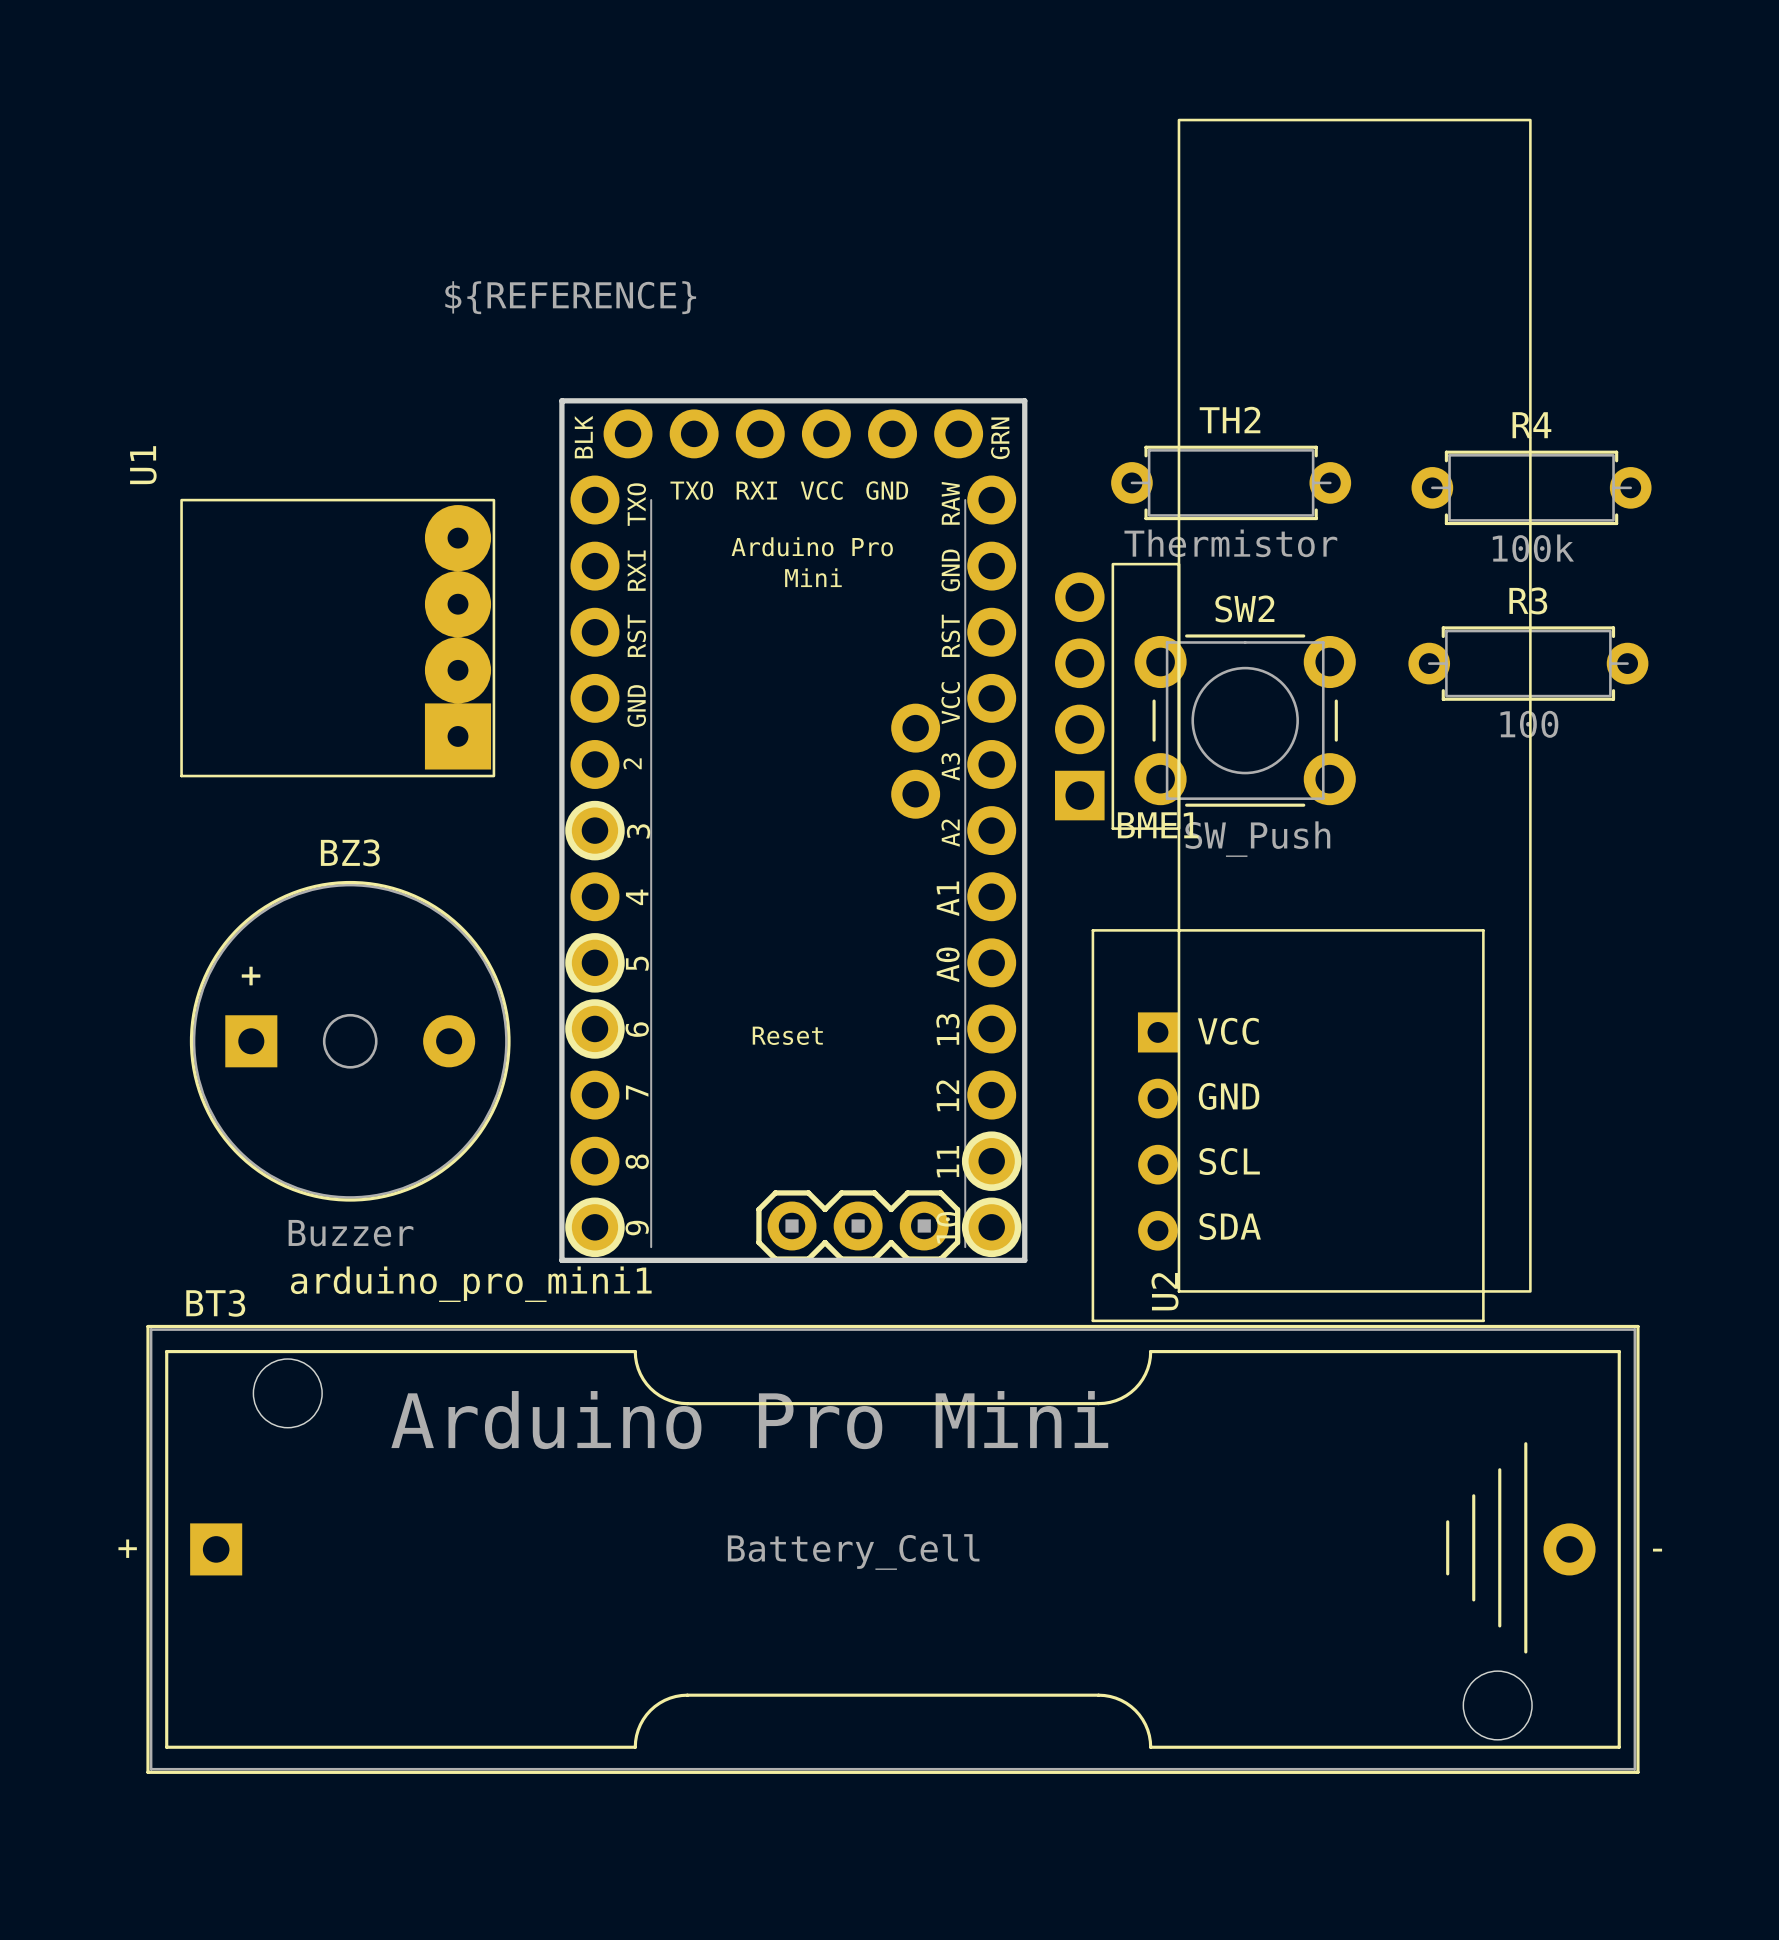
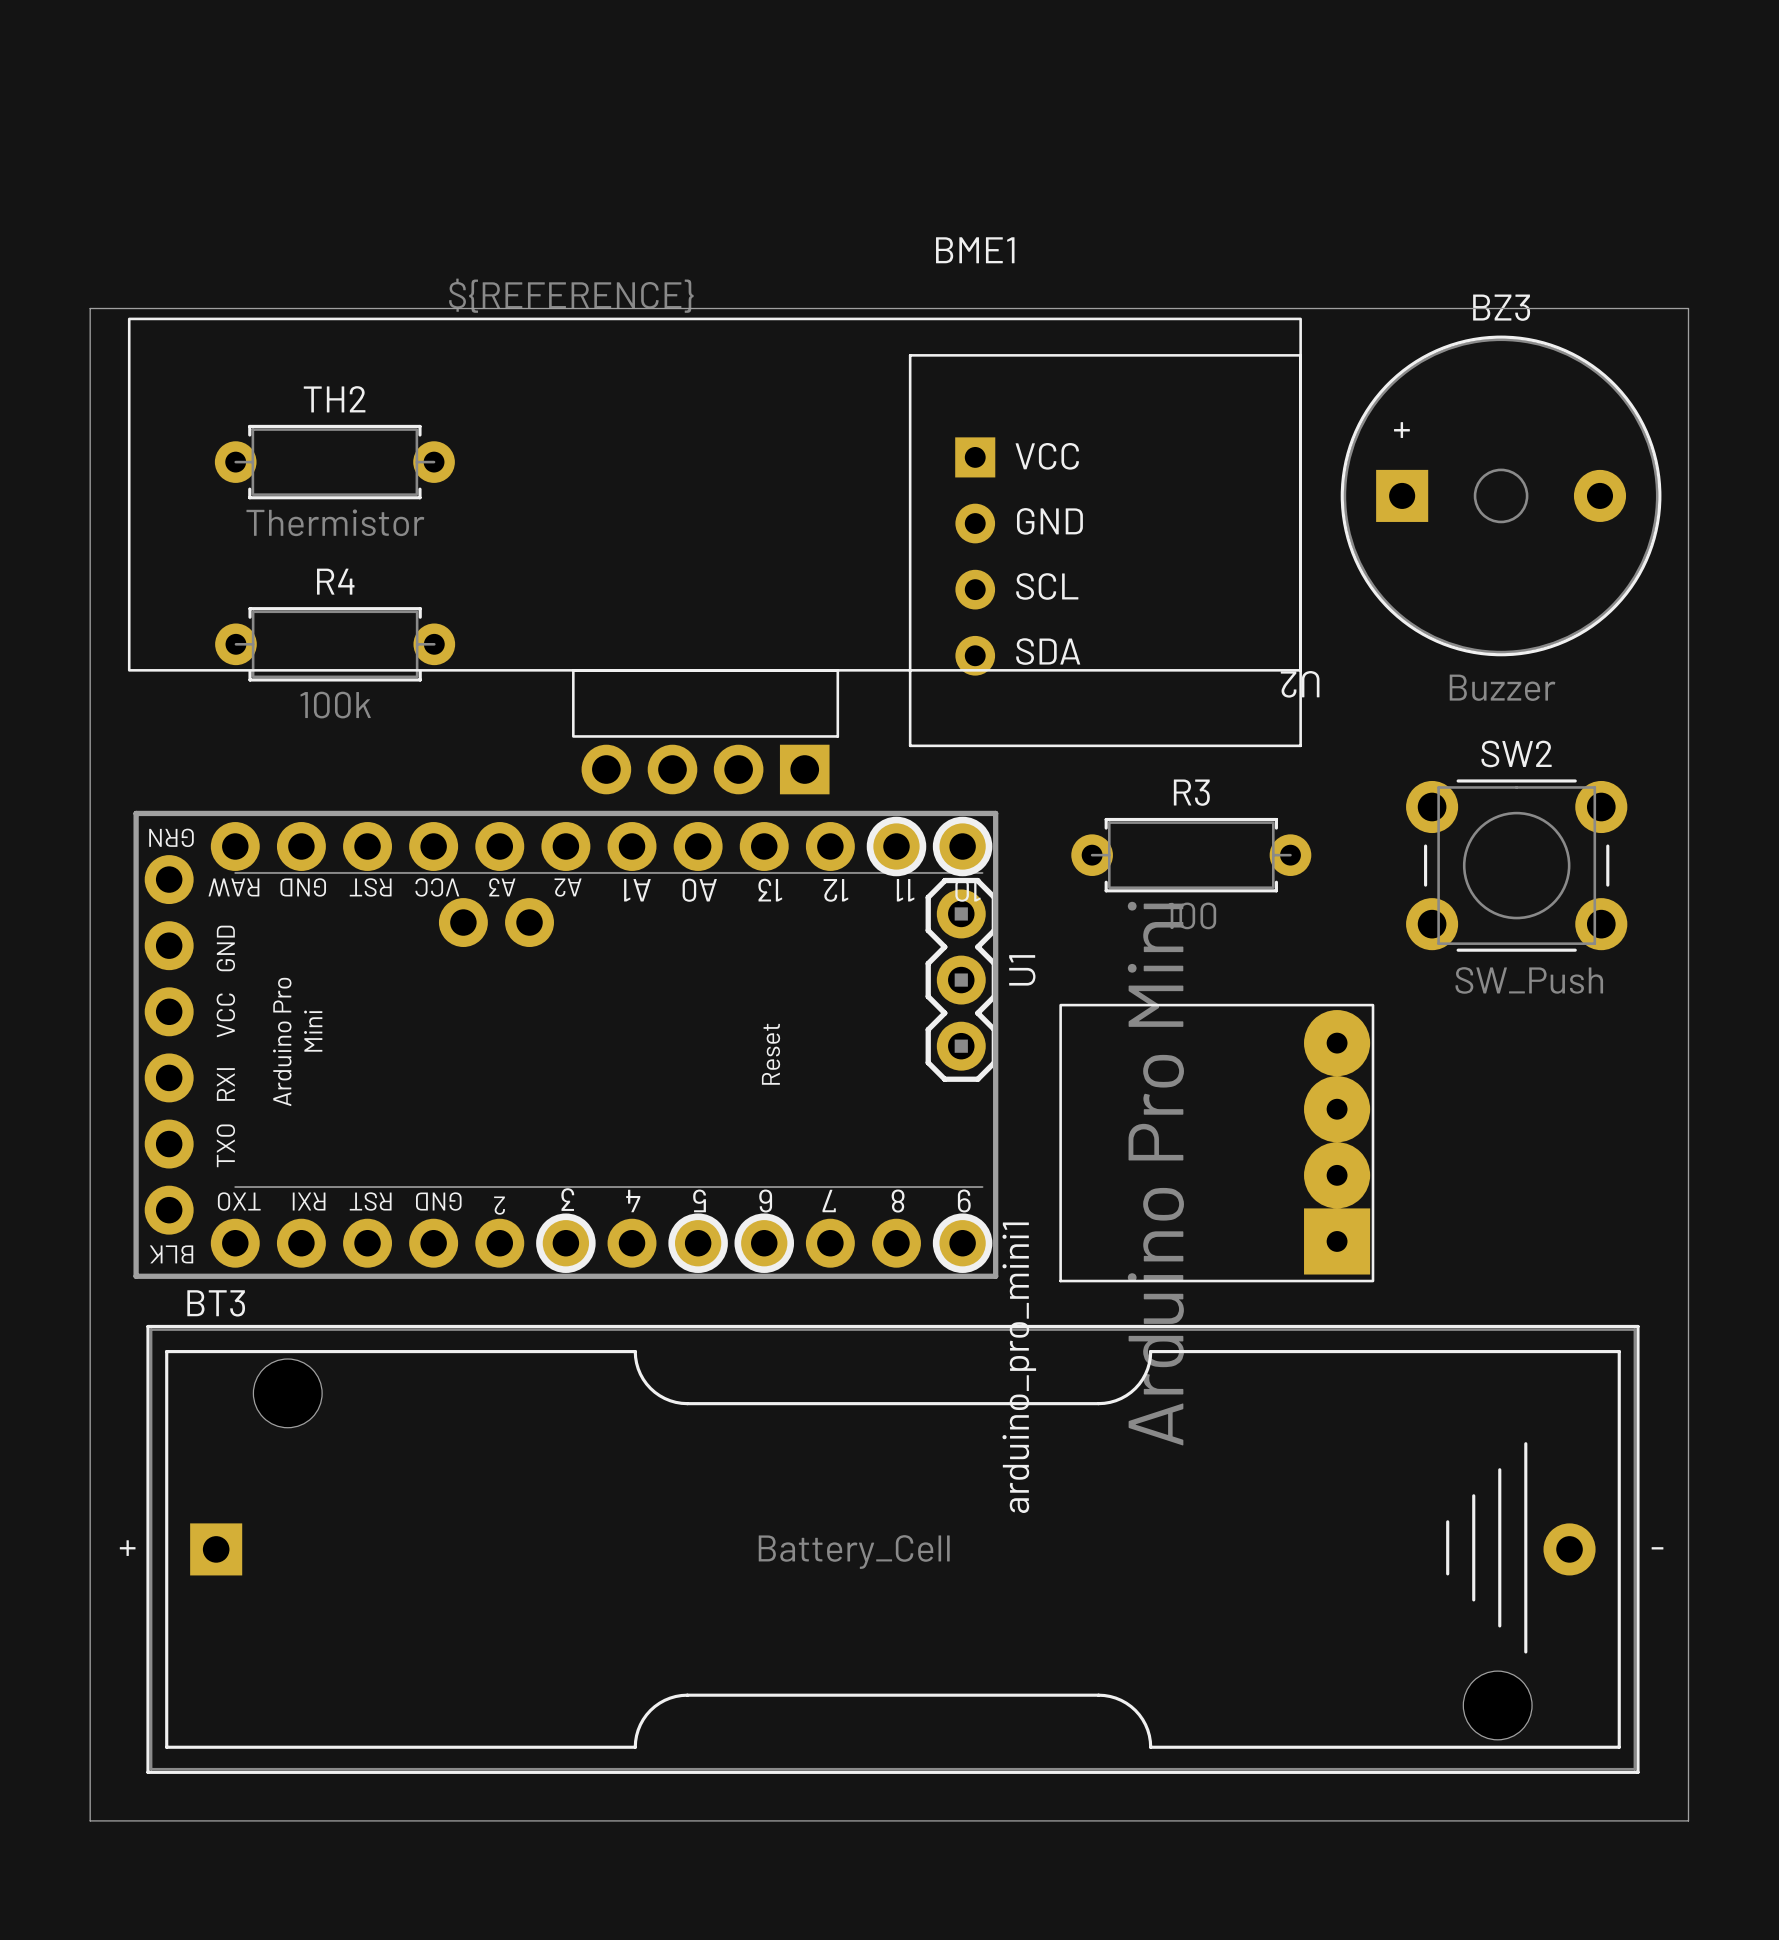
board edge: none -> (90, 308) (1688, 308) (1688, 1820) (90, 1820) (90, 308)
TH2 position: (1231, 482) -> (334, 462)
R4 position: (1531, 487) -> (335, 644)
U1 position: (337, 638) -> (1216, 1143)
R3 position: (1528, 663) -> (1191, 855)
U2 rotation: 0° (1293, 705) -> 90° counterclockwise (714, 555)
SW2 position: (1245, 720) -> (1516, 865)
arduino_pro_mini1 rotation: 0° (793, 830) -> 90° counterclockwise (565, 1044)
BZ3 position: (350, 1041) -> (1501, 495)
BME1 position: (1288, 1125) -> (1105, 550)

